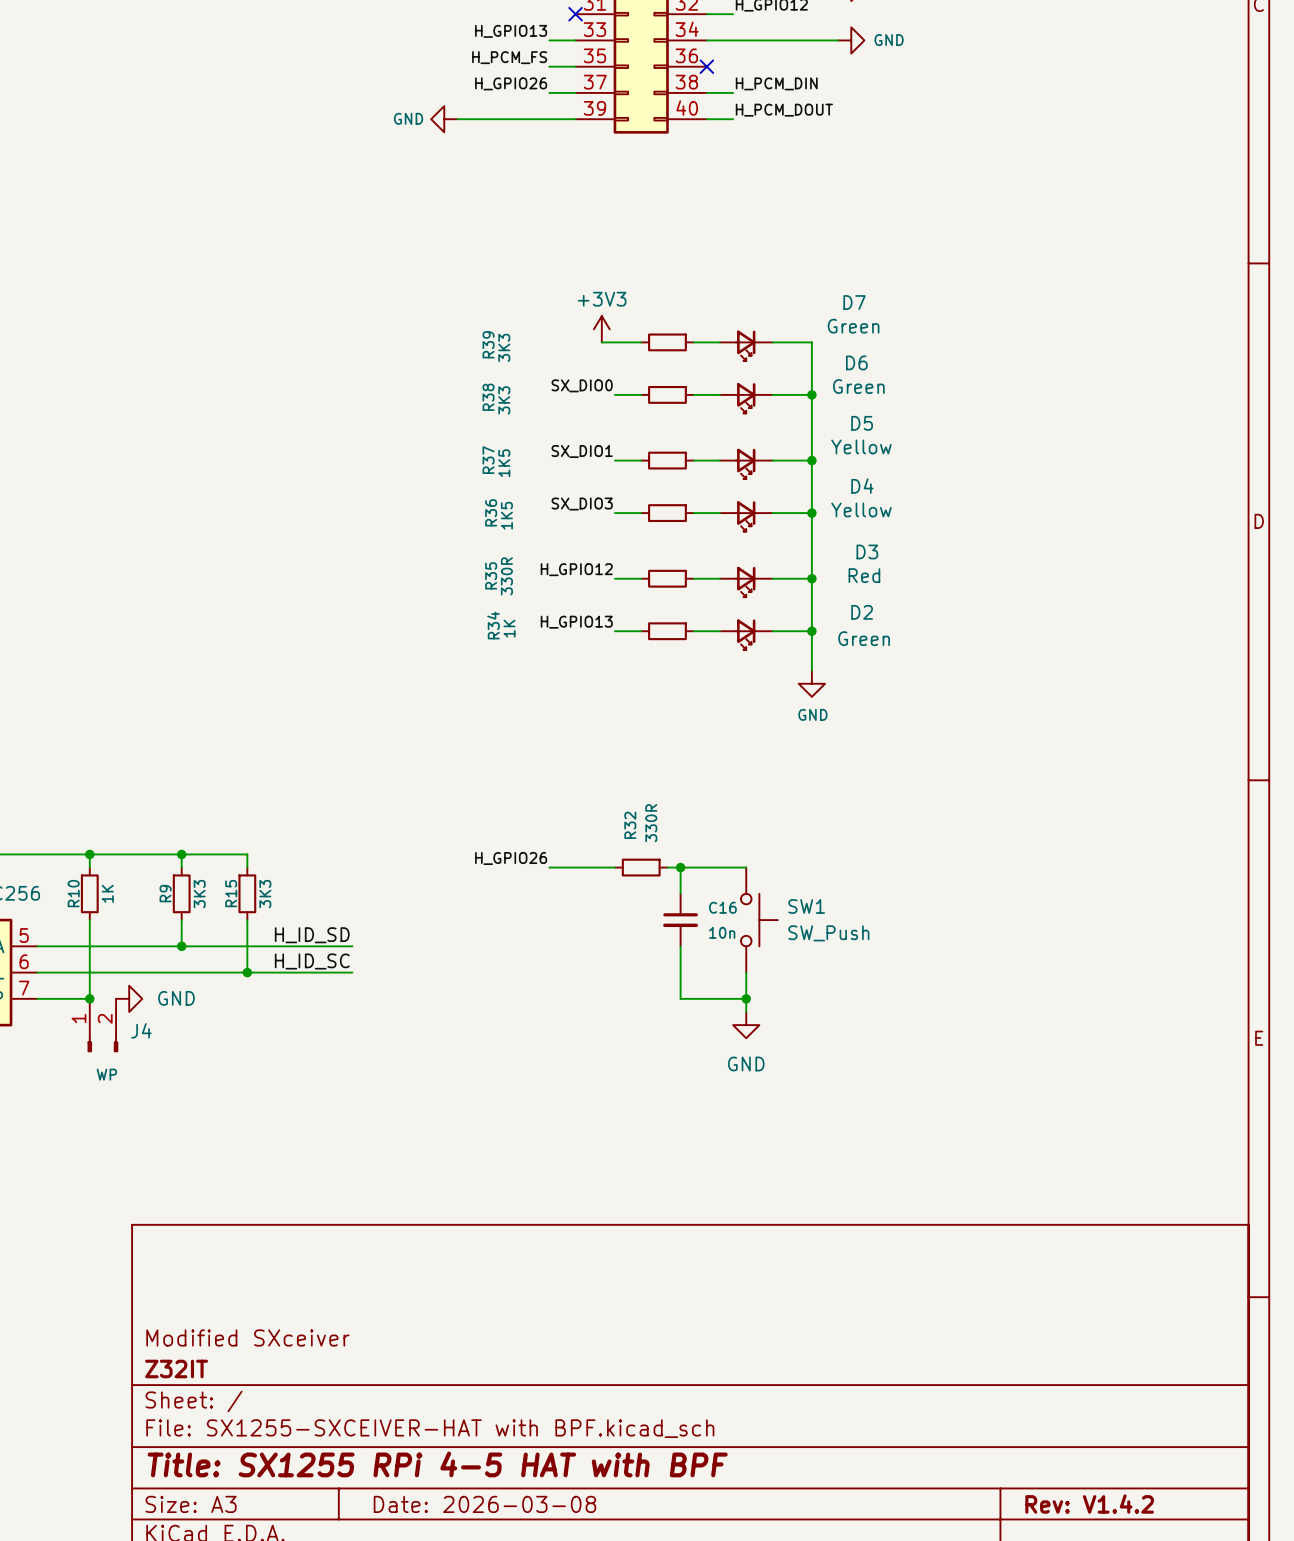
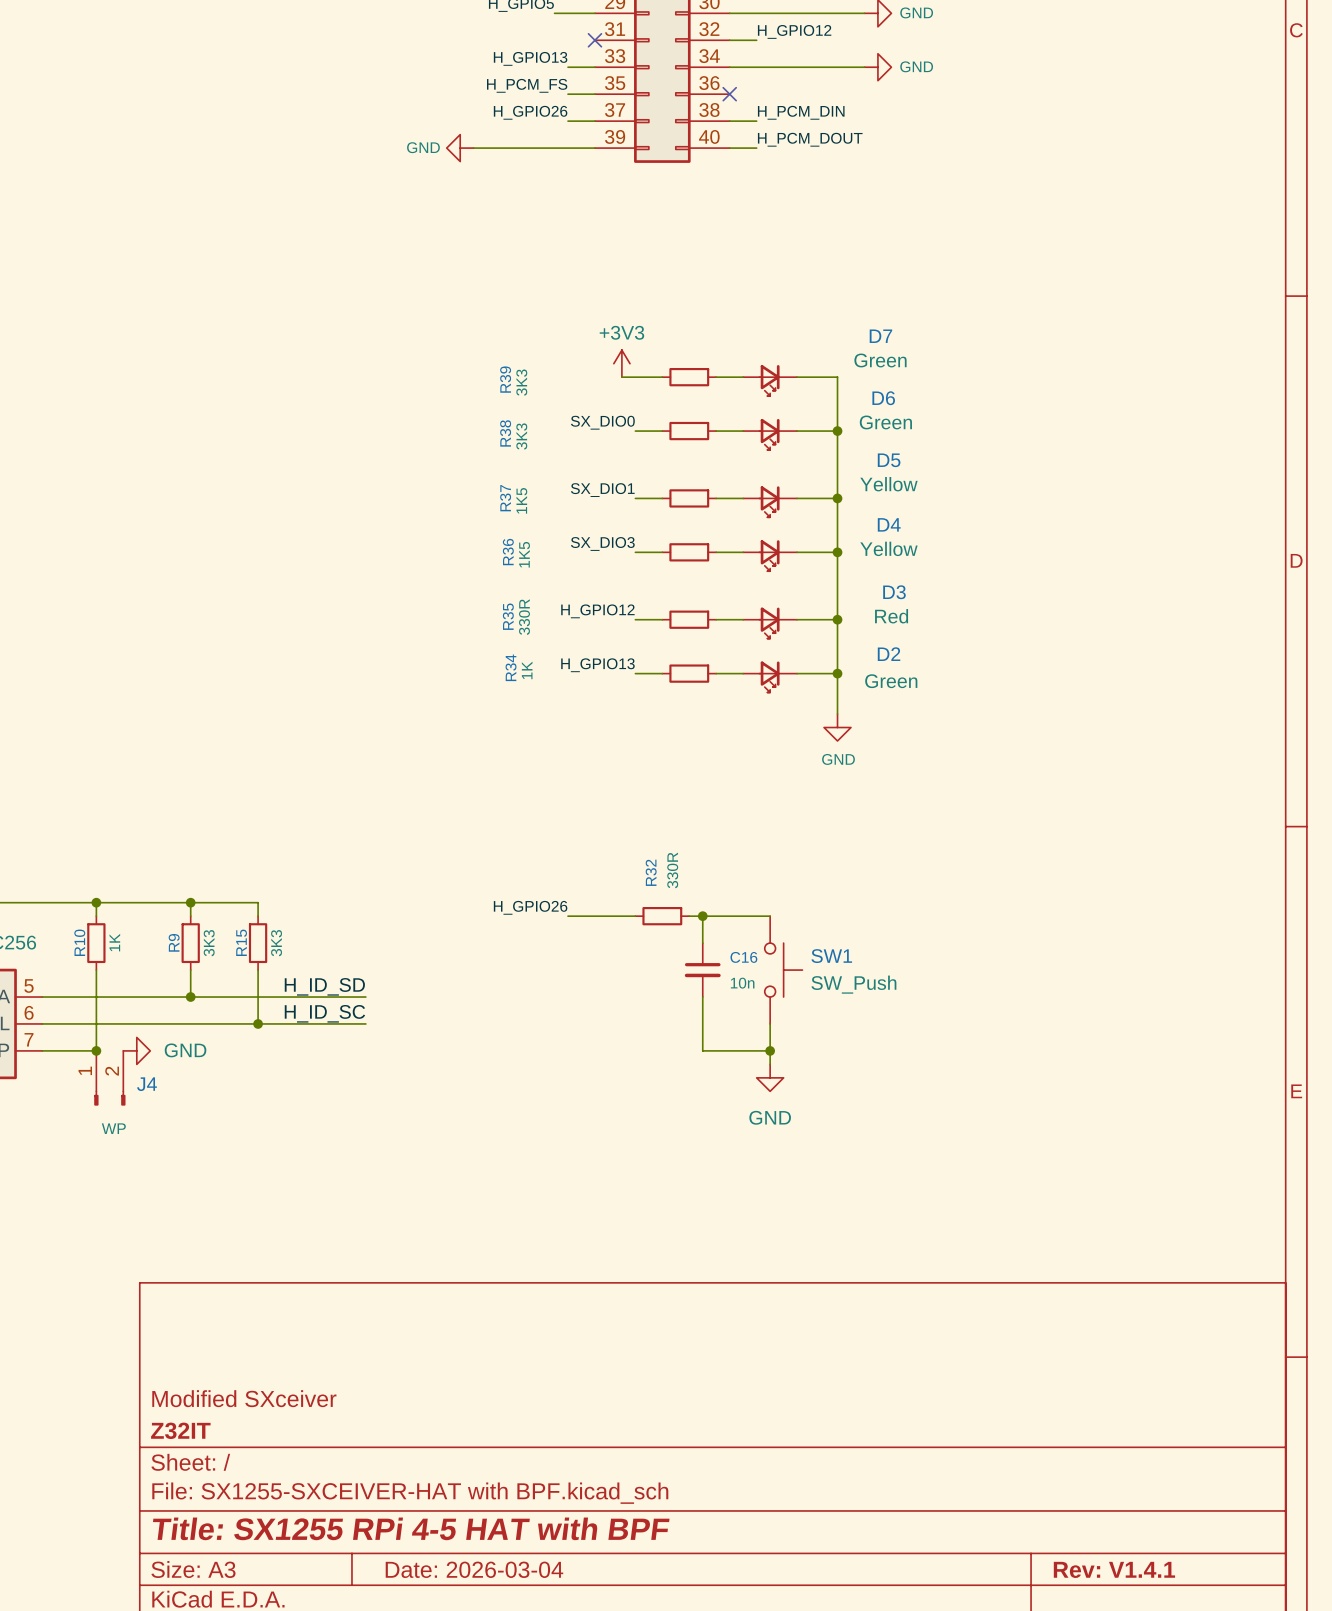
title block: Date: 2026-03-08 (484, 1504) -> Date: 2026-03-04 (474, 1569)
title block: Rev: V1.4.2 (1089, 1504) -> Rev: V1.4.1 (1114, 1569)

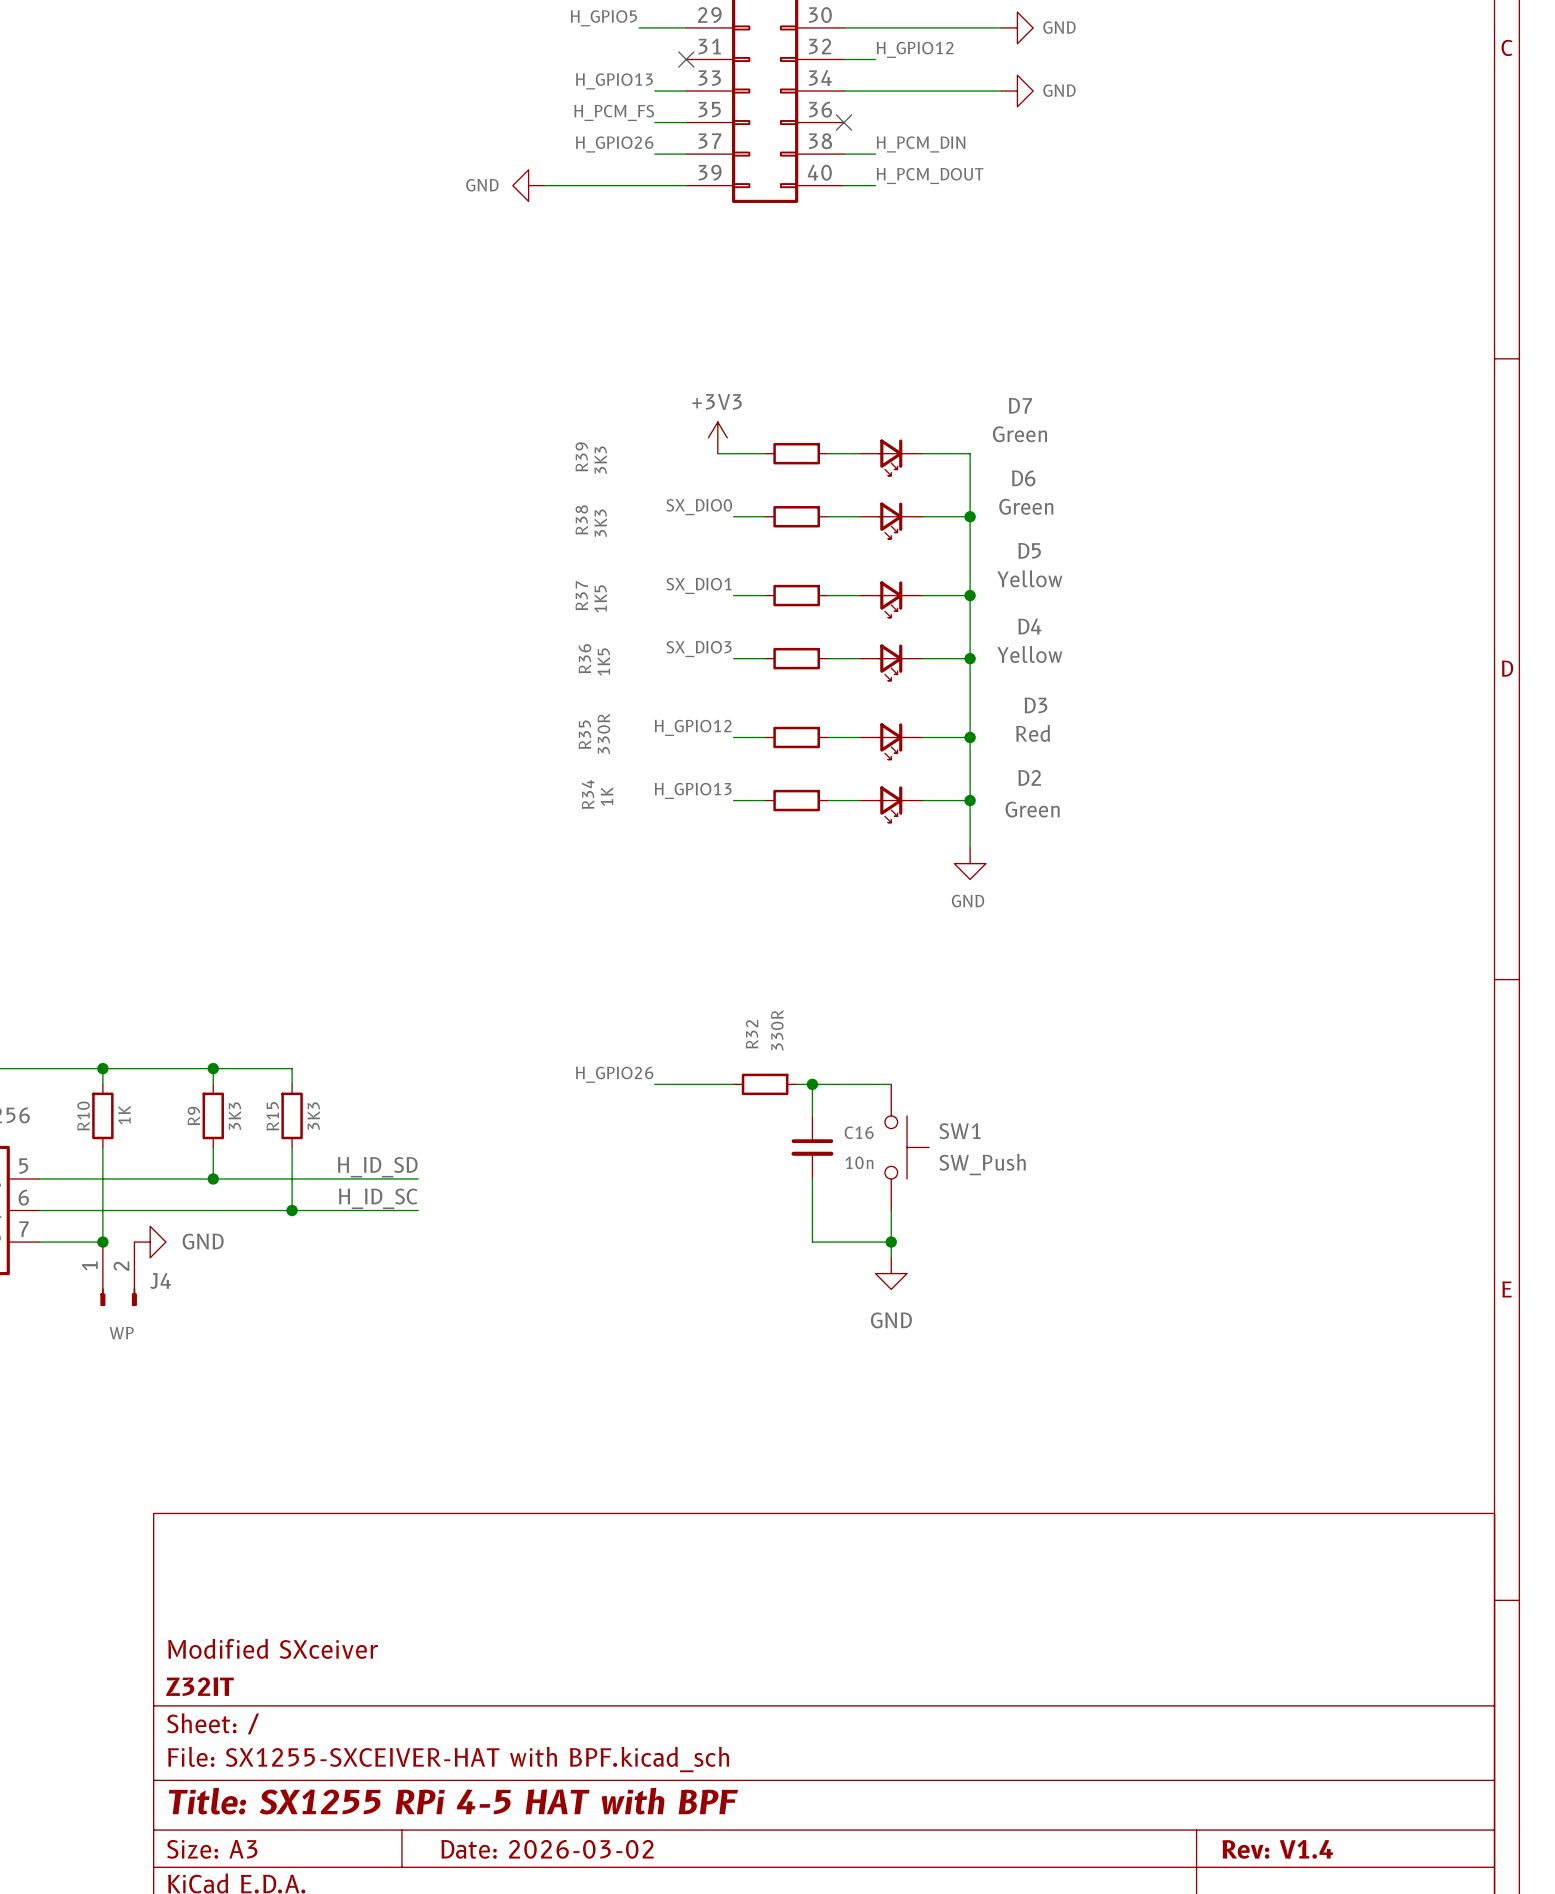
title block: Date: 2026-03-04 (474, 1569) -> Date: 2026-03-02 (547, 1849)
title block: Rev: V1.4.1 (1114, 1569) -> Rev: V1.4 (1277, 1849)

